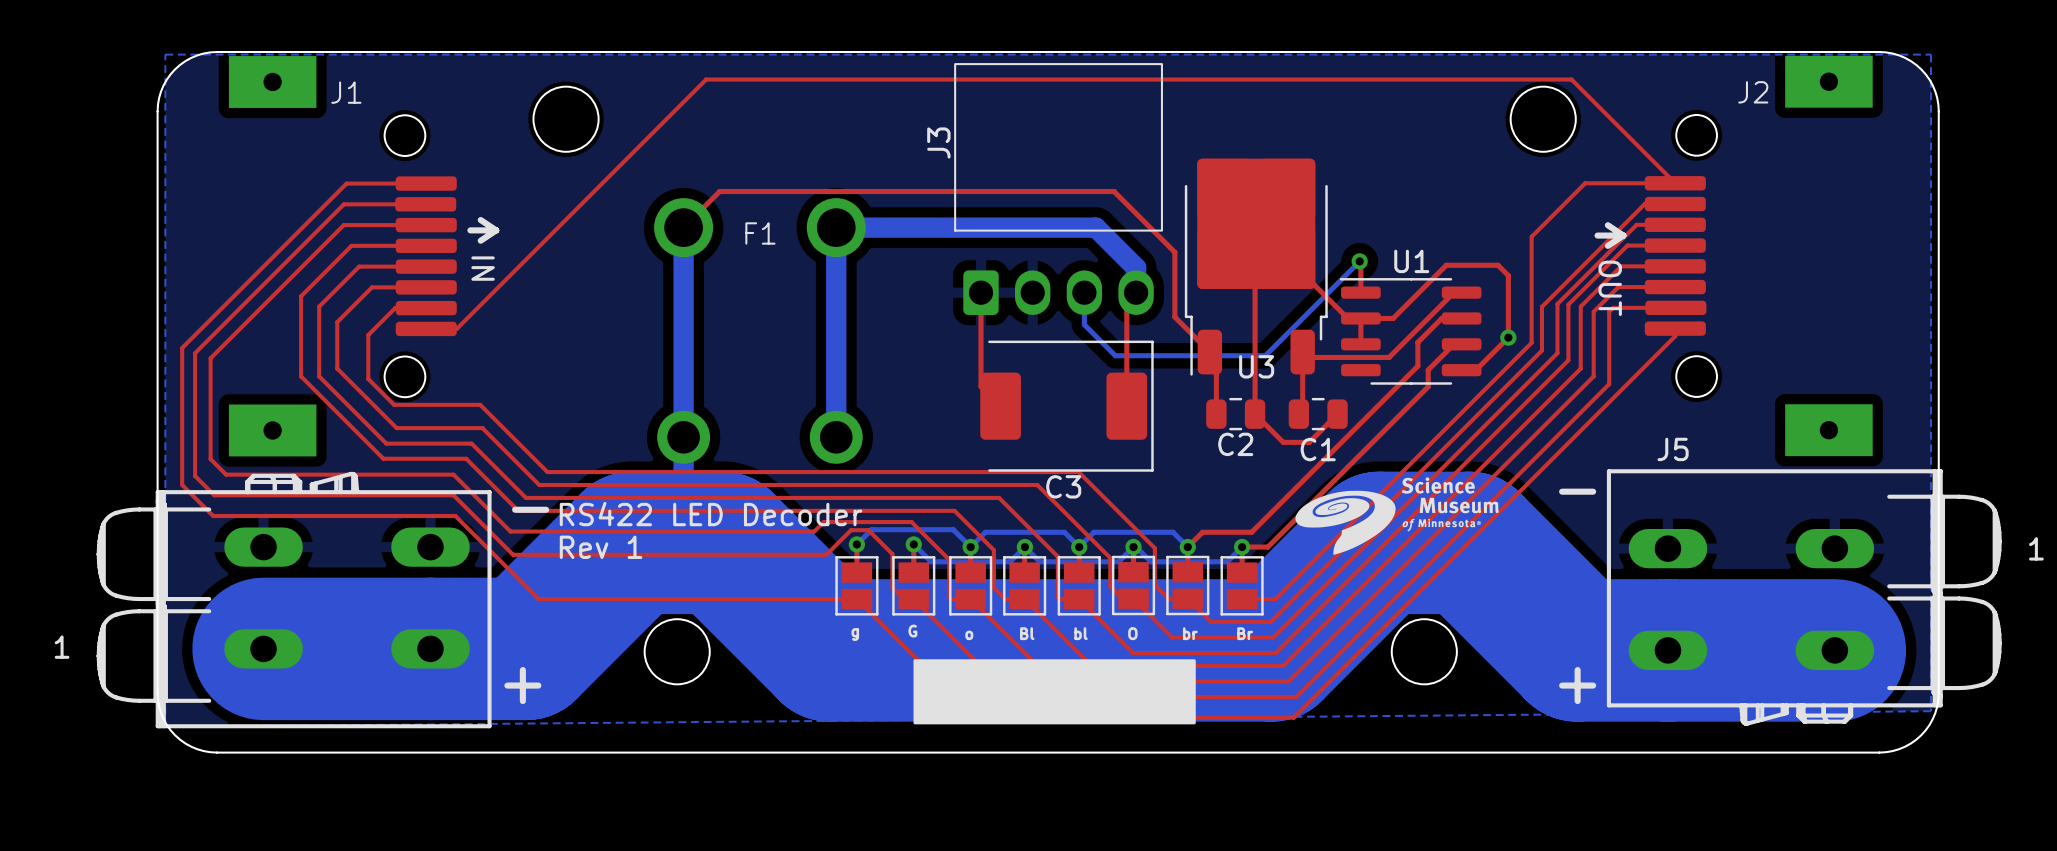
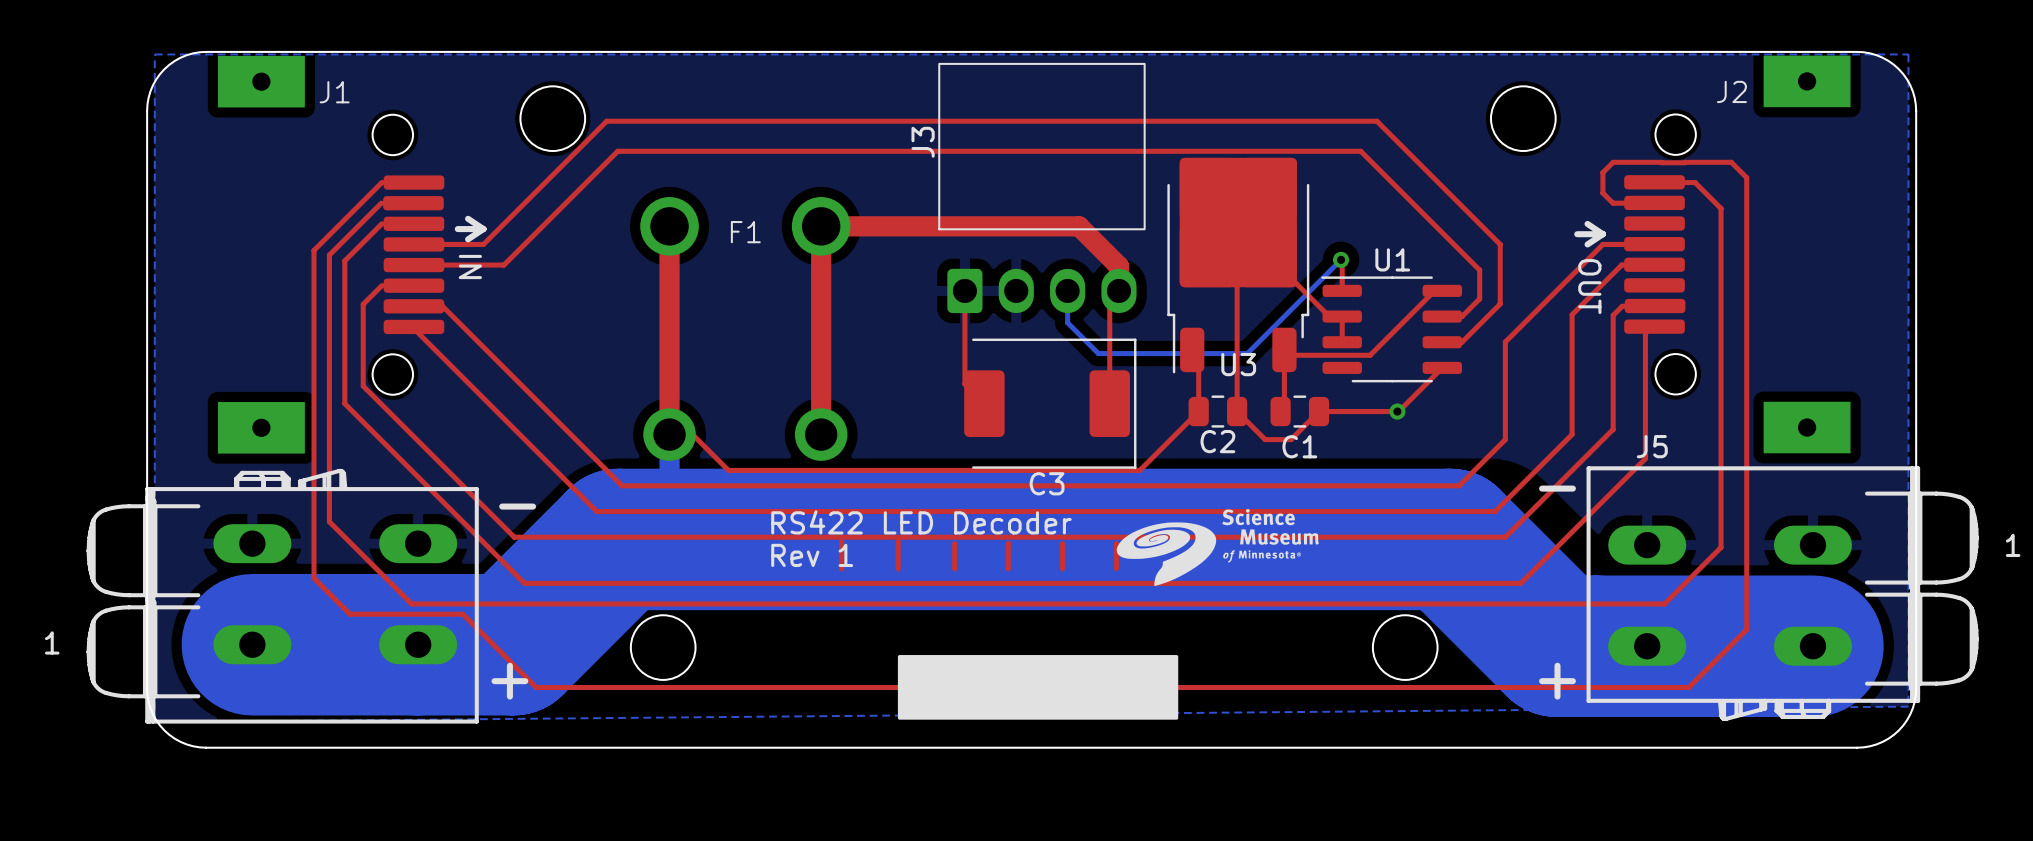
top track: (393, 183) (346, 183) (182, 347) (182, 484) (213, 516) (455, 516) (538, 599) (856, 599) (975, 717) (1293, 717) (1675, 336) (1675, 328) -> (381, 182) (314, 250) (314, 578) (349, 614) (462, 614) (536, 687) (1688, 687) (1746, 629) (1746, 177) (1731, 162) (1613, 162) (1602, 172) (1602, 193) (1613, 203) (1652, 203)
top track: (393, 204) (343, 204) (195, 353) (195, 476) (214, 495) (453, 495) (513, 554) (826, 554) (851, 530) (868, 530) (892, 554) (892, 587) (903, 599) (913, 599) (1011, 696) (1296, 696) (1609, 384) (1609, 311) (1613, 307) (1675, 307) -> (381, 203) (329, 255) (329, 521) (411, 603) (1664, 603) (1721, 547) (1721, 208) (1695, 182) (1652, 182)
top track: (1675, 204) (1644, 204) (1541, 306) (1541, 350) (1270, 622) (1211, 622) (1187, 598) (1168, 598) (1154, 585) (1154, 548) (1078, 472) (547, 472) (480, 404) (394, 404) (368, 379) (368, 335) (395, 308) (424, 308) -> none
top track: (1675, 224) (1636, 224) (1557, 304) (1557, 353) (1273, 637) (1172, 637) (1133, 598) (1122, 598) (1110, 586) (1110, 557) (1037, 484) (539, 484) (482, 428) (396, 428) (337, 368) (337, 322) (372, 287) (393, 287) -> (1652, 306) (1622, 306) (1613, 315) (1613, 429) (1505, 537) (514, 537) (363, 386) (363, 304) (381, 285)
top track: (393, 225) (343, 225) (210, 358) (210, 459) (226, 474) (453, 474) (510, 531) (814, 531) (823, 522) (911, 522) (949, 559) (949, 597) (951, 599) (970, 599) (1053, 681) (1288, 681) (1593, 376) (1593, 311) (1618, 287) (1675, 287) -> (381, 223) (344, 260) (344, 403) (524, 583) (1520, 583) (1645, 458) (1645, 333) (1652, 326)
top track: (683, 227) (719, 191) (1114, 191) (1174, 252) (1174, 317) (1209, 352) -> (669, 226) (669, 434)
bottom track: (683, 227) (683, 437) -> none
top track: (424, 245) (351, 245) (301, 296) (301, 376) (383, 458) (466, 458) (518, 510) (954, 510) (993, 550) (993, 587) (1005, 599) (1024, 599) (1091, 665) (1283, 665) (1580, 368) (1580, 306) (1621, 266) (1675, 266) -> none
top track: none -> (1652, 244) (1602, 244) (1505, 342) (1505, 439) (1459, 485) (622, 485) (442, 306) (413, 306)
top track: (1675, 245) (1627, 245) (1568, 304) (1568, 360) (1275, 653) (1133, 653) (1079, 599) (1059, 599) (1057, 597) (1057, 556) (999, 497) (526, 497) (471, 443) (386, 443) (319, 376) (319, 306) (359, 266) (424, 266) -> none
top track: none -> (1652, 265) (1621, 265) (1572, 314) (1572, 434) (1495, 511) (596, 511) (412, 326)
top track: none -> (1118, 290) (1118, 266) (1079, 226) (821, 226) (821, 434)
bottom track: (1136, 292) (1136, 267) (1095, 227) (836, 227) (836, 437) -> none
top track: (1360, 318) (1393, 318) (1446, 265) (1498, 265) (1508, 275) (1508, 337) (1475, 370) (1461, 370) -> (1319, 411) (1398, 411) (1442, 367)
top track: (1461, 318) (1441, 318) (1417, 342) (1417, 366) (1251, 532) (1202, 532) (1187, 547) (1187, 572) -> (1442, 316) (1462, 316) (1479, 298) (1479, 270) (1360, 151) (617, 151) (503, 265) (413, 265)
top track: (426, 328) (456, 328) (706, 79) (1571, 79) (1675, 183) (1585, 183) (1531, 236) (1531, 342) (1275, 599) (1242, 599) -> none
via: (1508, 337) -> none
top track: (1461, 344) (1453, 344) (1428, 369) (1428, 386) (1267, 547) (1242, 547) (1242, 572) -> (1442, 342) (1462, 342) (1500, 304) (1500, 244) (1376, 121) (606, 121) (483, 244) (413, 244)
top track: none -> (1198, 411) (1139, 470) (728, 470) (688, 430)
via: none -> (1397, 411)
text position: RS422 LED Decoder (711, 514) -> RS422 LED Decoder (921, 522)
drawing position: (1397, 516) -> (1217, 547)
bottom track: (722, 542) (829, 650) (1271, 650) (1379, 542) -> (708, 539) (1360, 539)
bottom track: (856, 544) (871, 529) (953, 529) (970, 547) (985, 532) (1064, 532) (1079, 547) (1093, 532) (1173, 532) (1187, 547) -> none
via: (856, 544) -> none
bottom track: (913, 544) (931, 561) (1010, 561) (1024, 547) (1039, 561) (1118, 561) (1133, 547) (1136, 547) (1150, 561) (1227, 561) (1242, 547) -> none
via: (913, 544) -> none
text position: Rev 1 (601, 547) -> Rev 1 (812, 555)
via: (970, 547) -> none
via: (1024, 547) -> none
via: (1079, 547) -> none
via: (1133, 547) -> none
via: (1187, 547) -> none
via: (1242, 547) -> none
part: (856, 585) -> none
part: (913, 585) -> none
part: (970, 585) -> none
part: (1024, 585) -> none
part: (1079, 585) -> none
part: (1133, 585) -> none
part: (1187, 585) -> none
part: (1242, 585) -> none
text: G (912, 631) -> none
text: Bl (1027, 633) -> none
text: bl (1081, 633) -> none
text: O (1132, 633) -> none
text: br (1190, 633) -> none
text: Br (1245, 633) -> none
text: g (855, 634) -> none
text: o (969, 635) -> none

